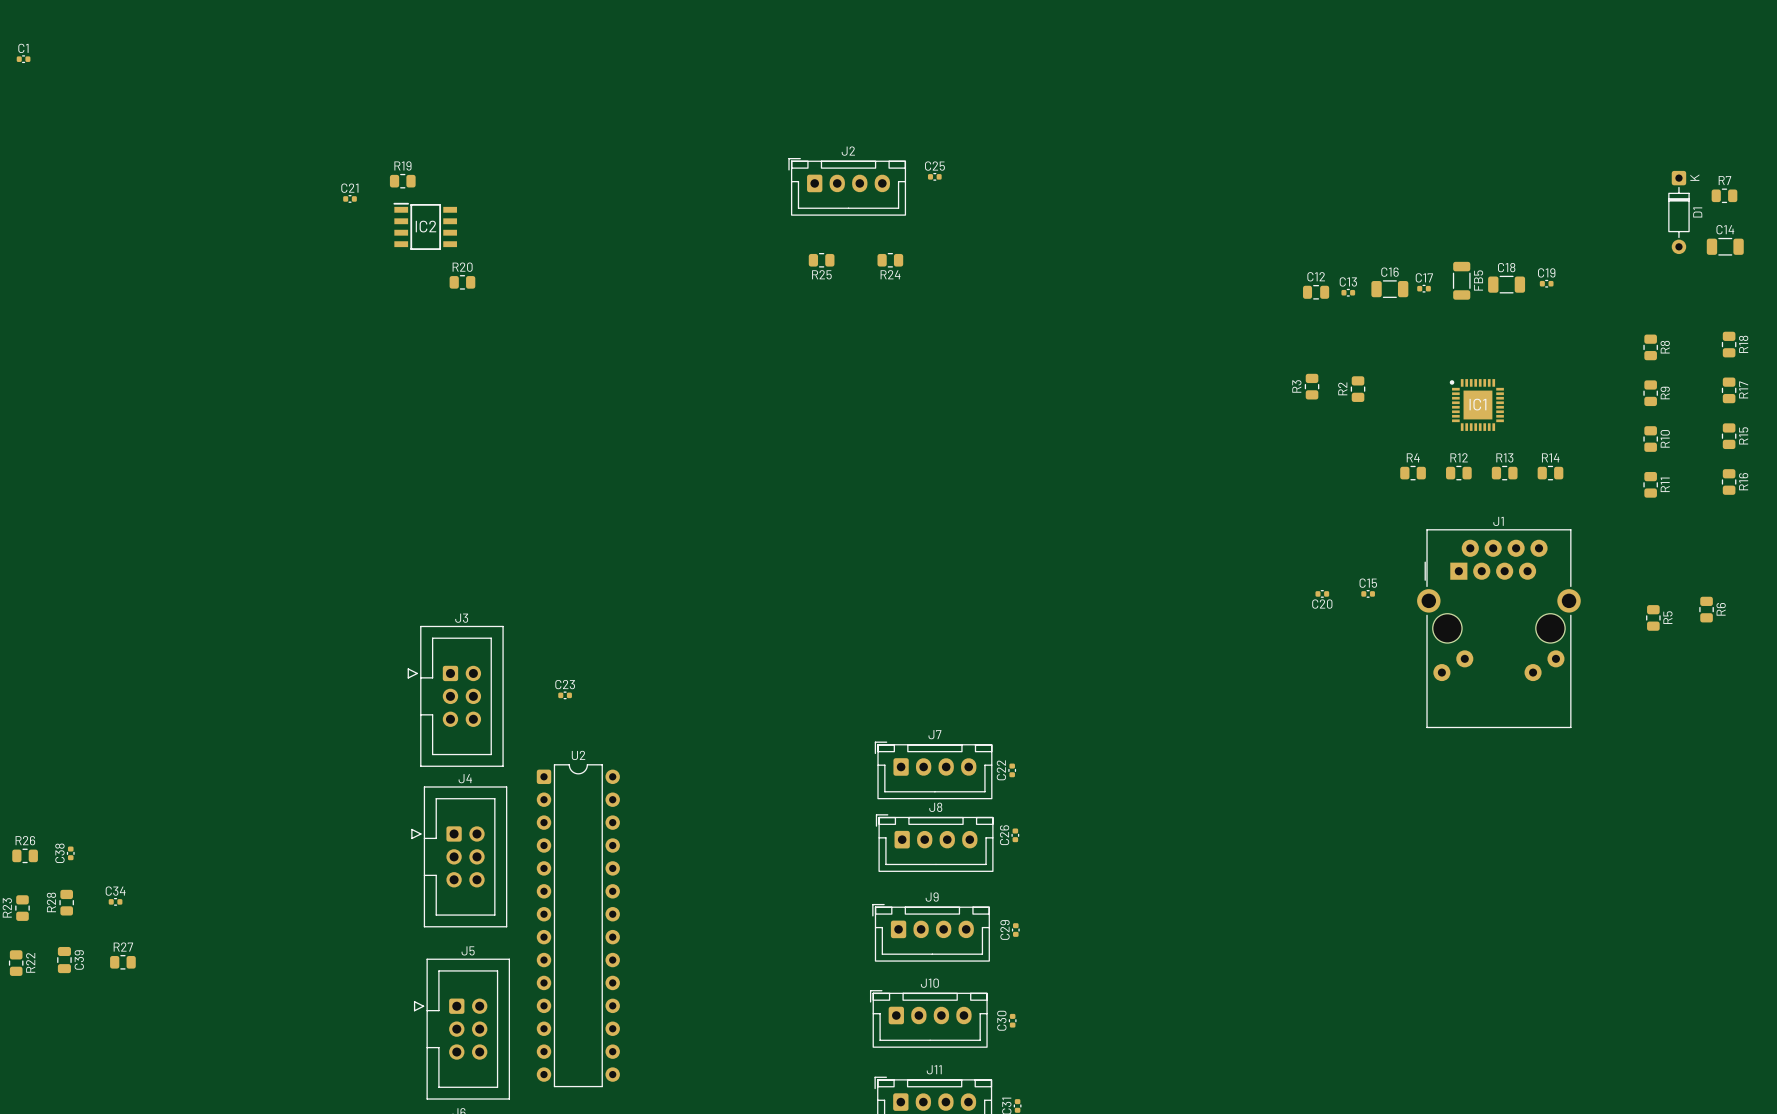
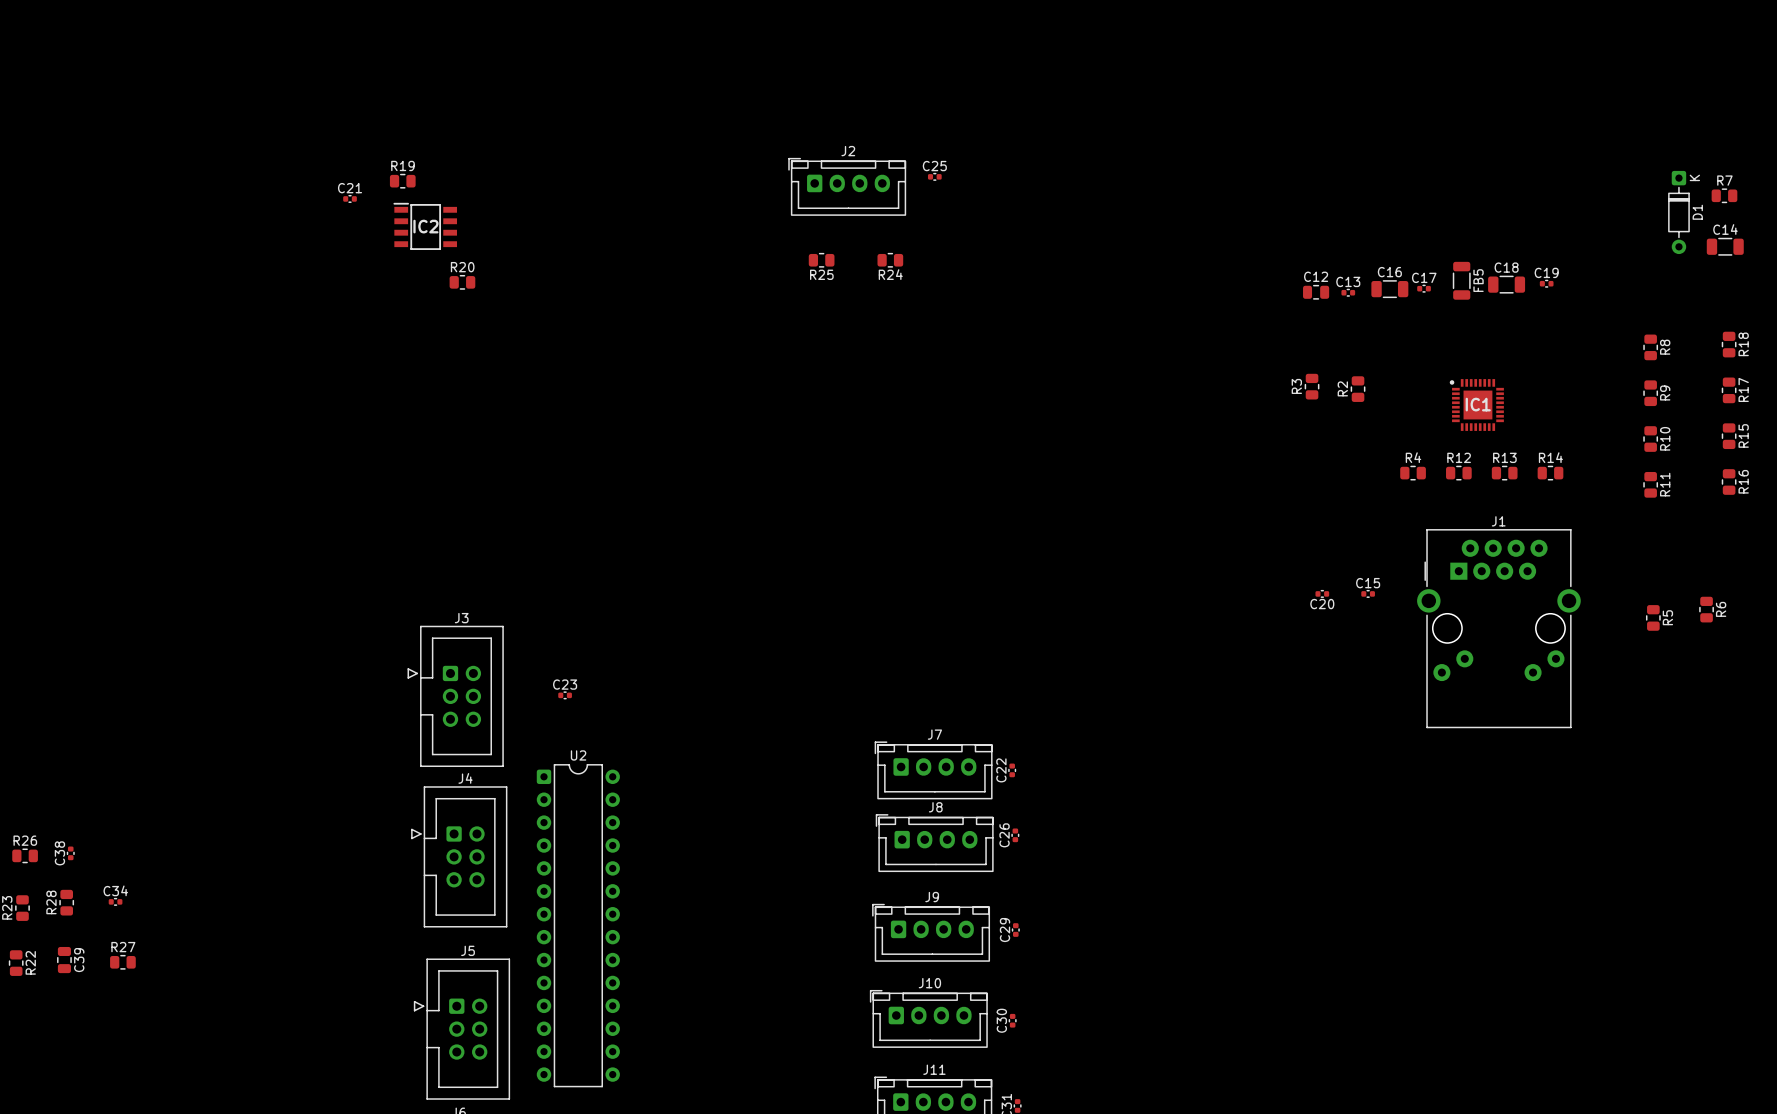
C1: (23, 59) -> none

